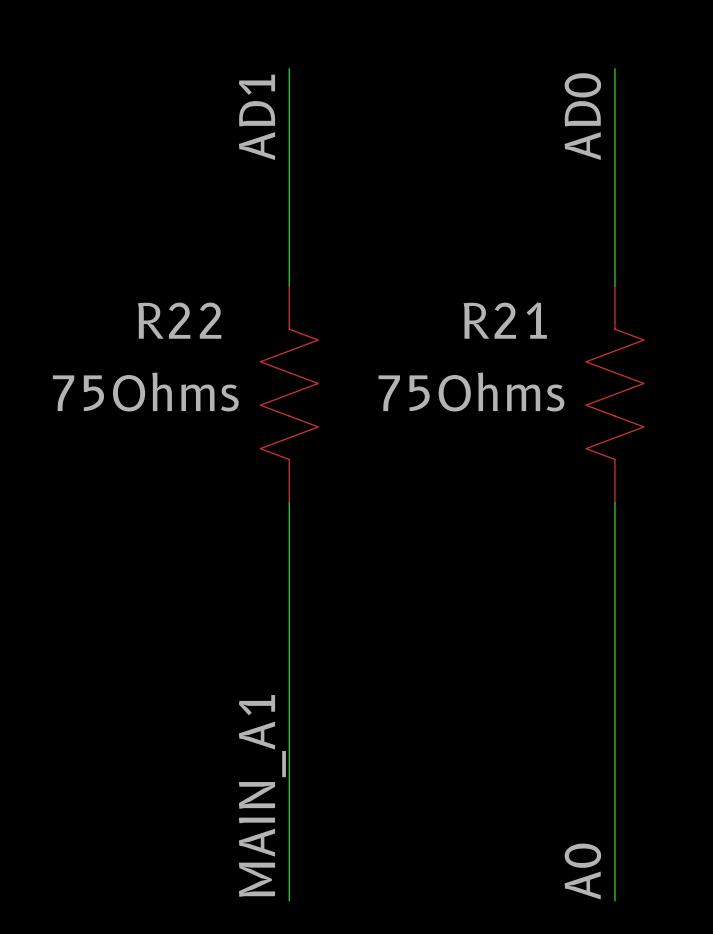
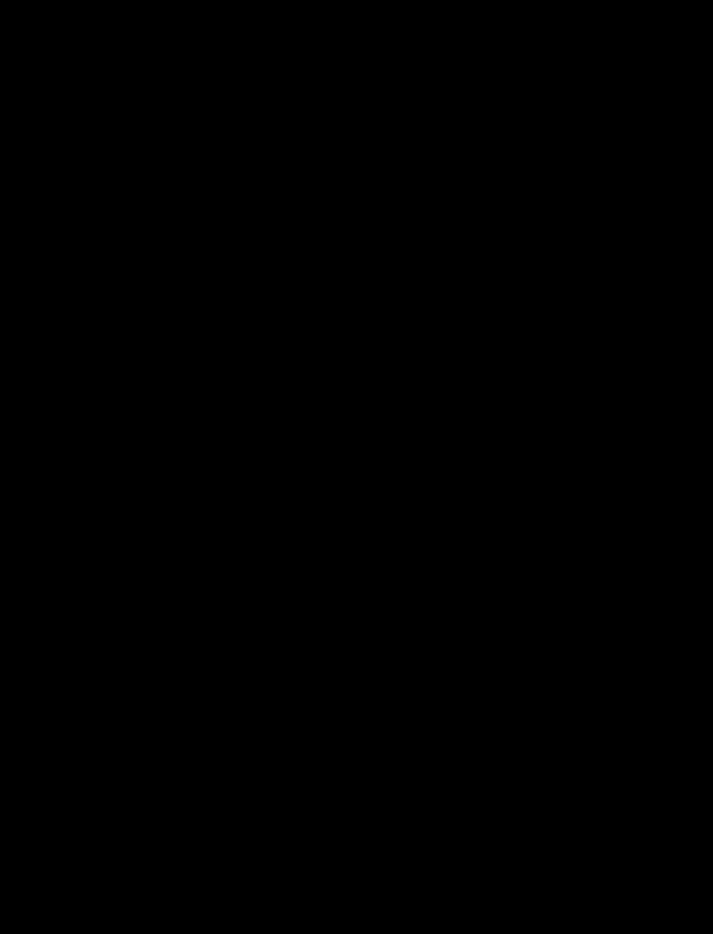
wire: (289, 68) (289, 285) -> none
wire: (614, 68) (614, 285) -> none
label: AD0 (582, 116) -> none
label: AD1 (256, 117) -> none
75Ohms: R22 (289, 394) -> none
75Ohms: R21 (614, 394) -> none
wire: (289, 502) (289, 900) -> none
wire: (614, 502) (614, 900) -> none
label: MAIN_A1 (262, 795) -> none
label: A0 (582, 871) -> none

